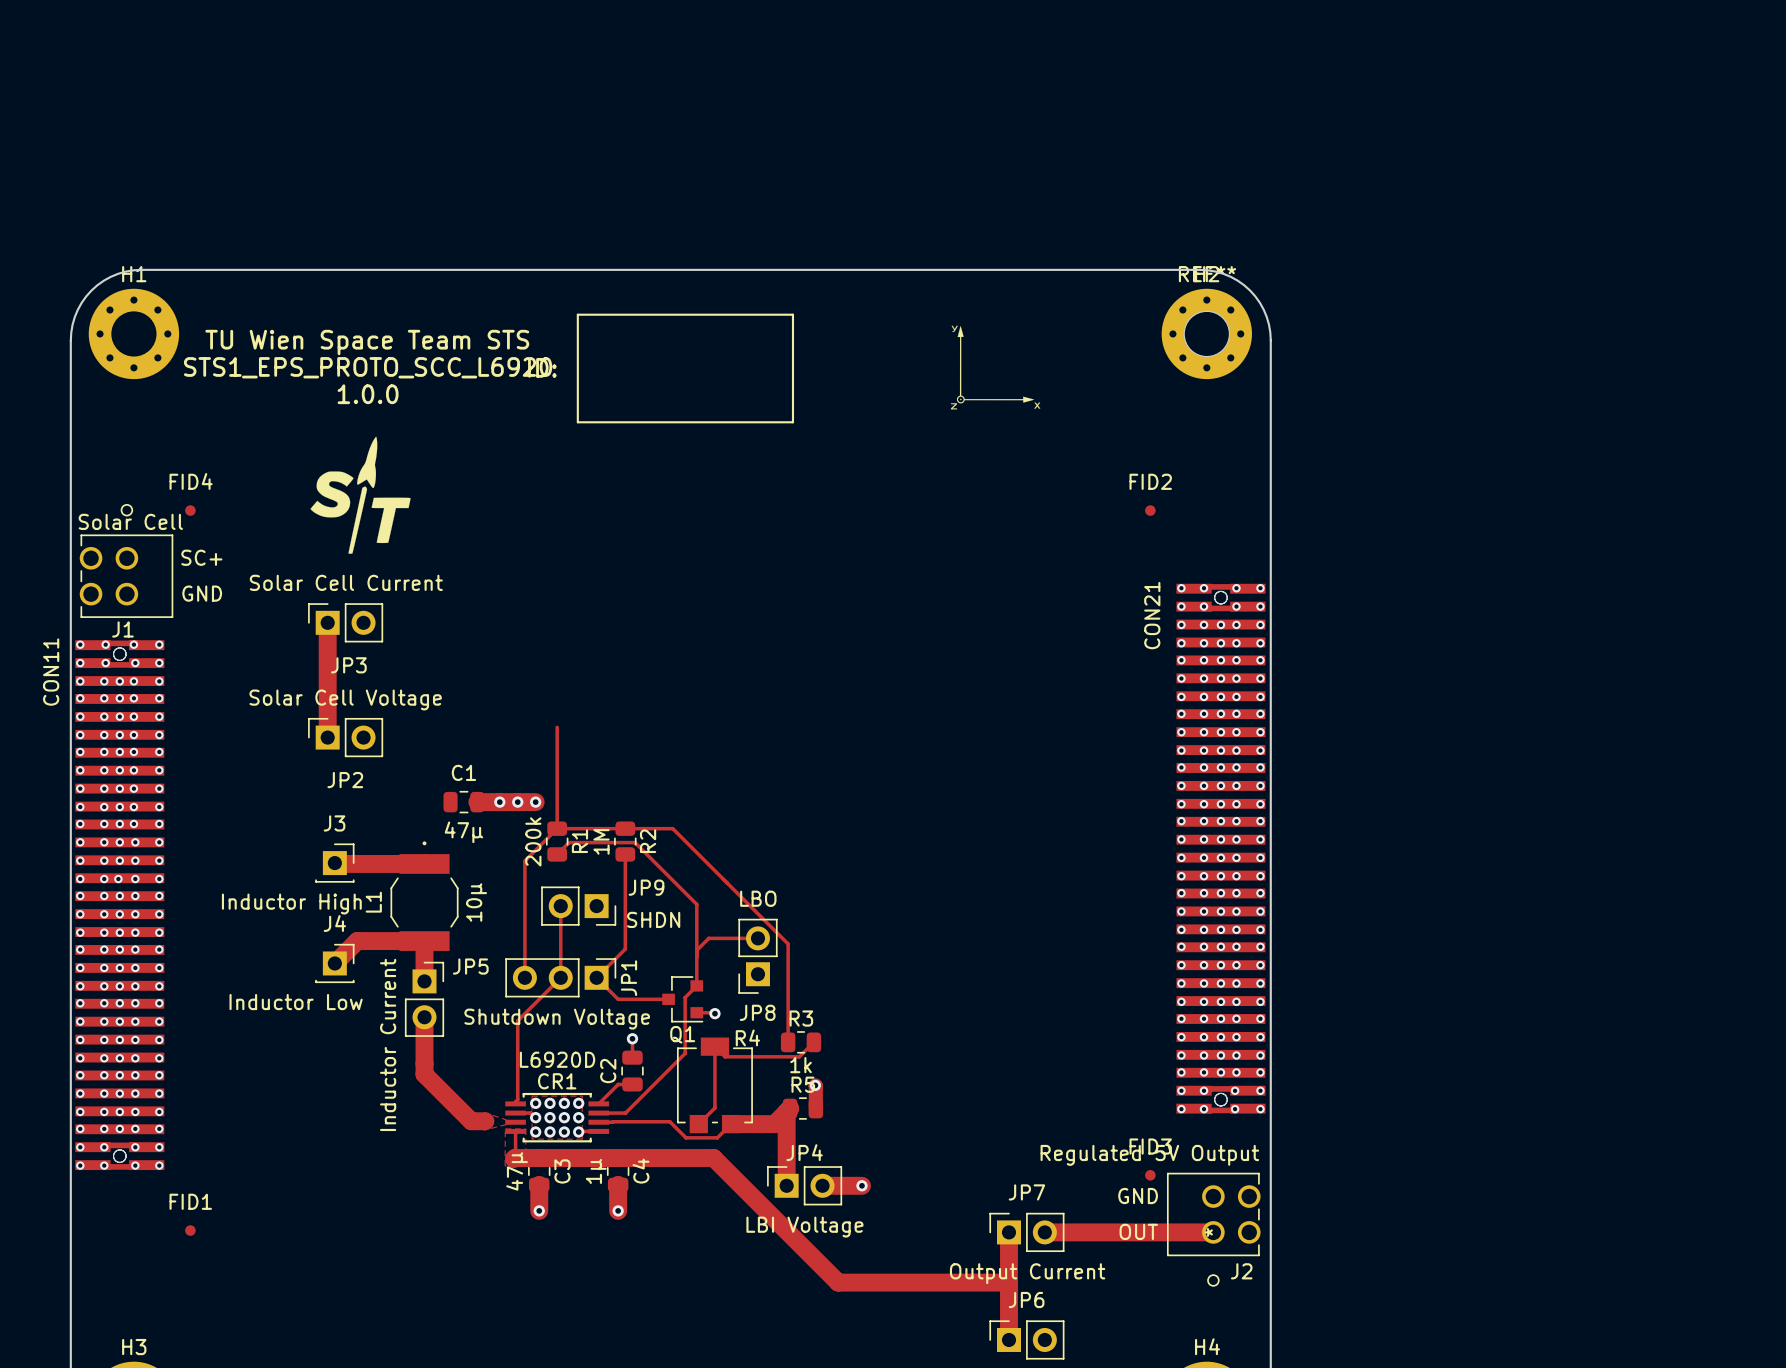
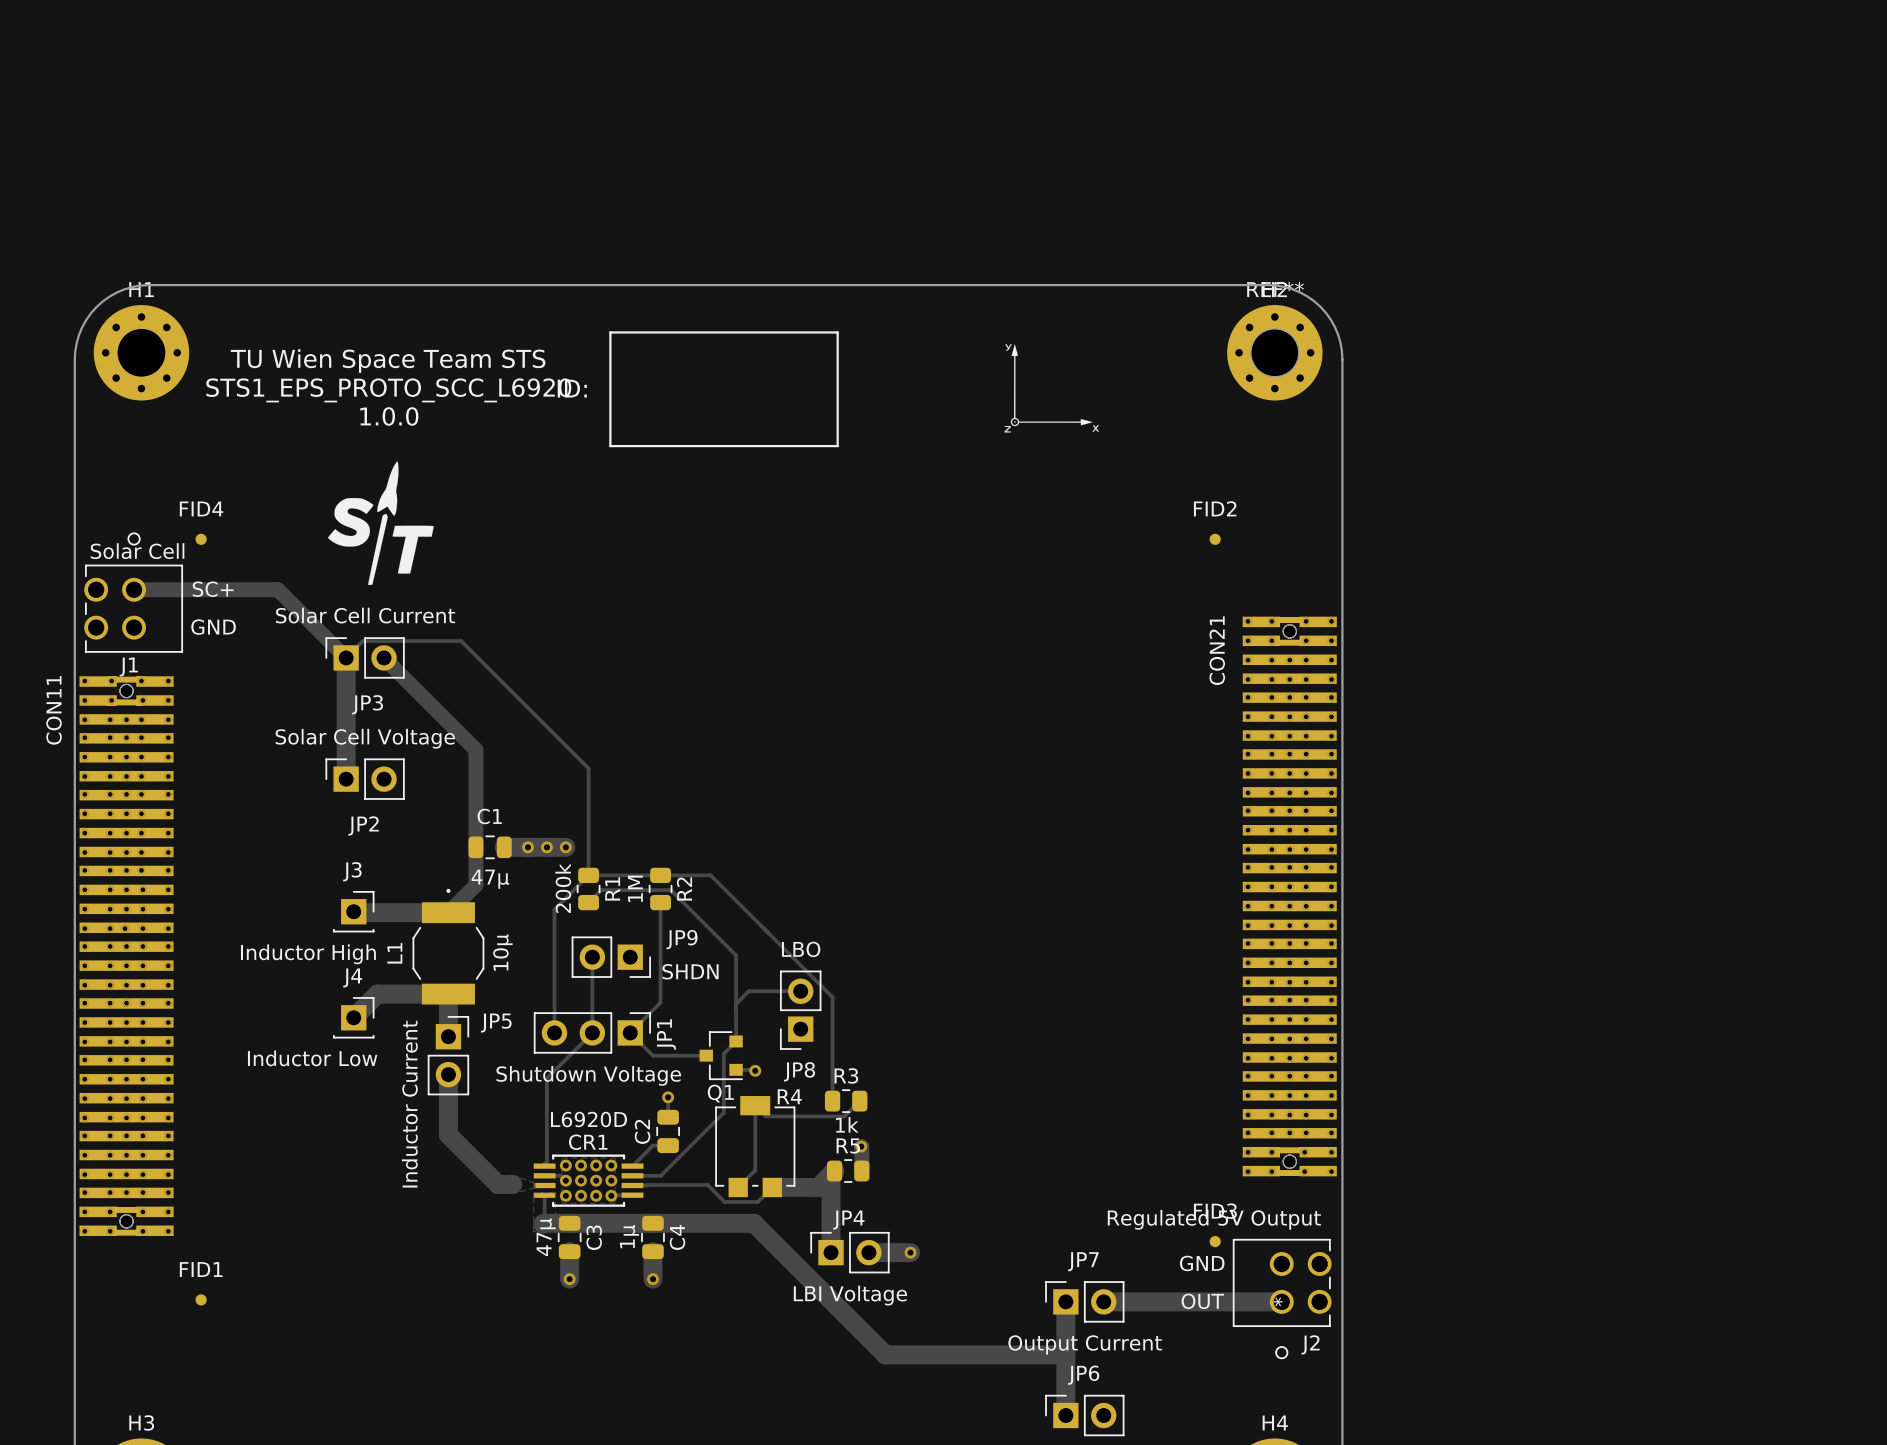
track: none -> (134, 589) (277, 589) (346, 657) (363, 641) (461, 641) (588, 768)
track: none -> (384, 657) (475, 749) (475, 885) (448, 912)

